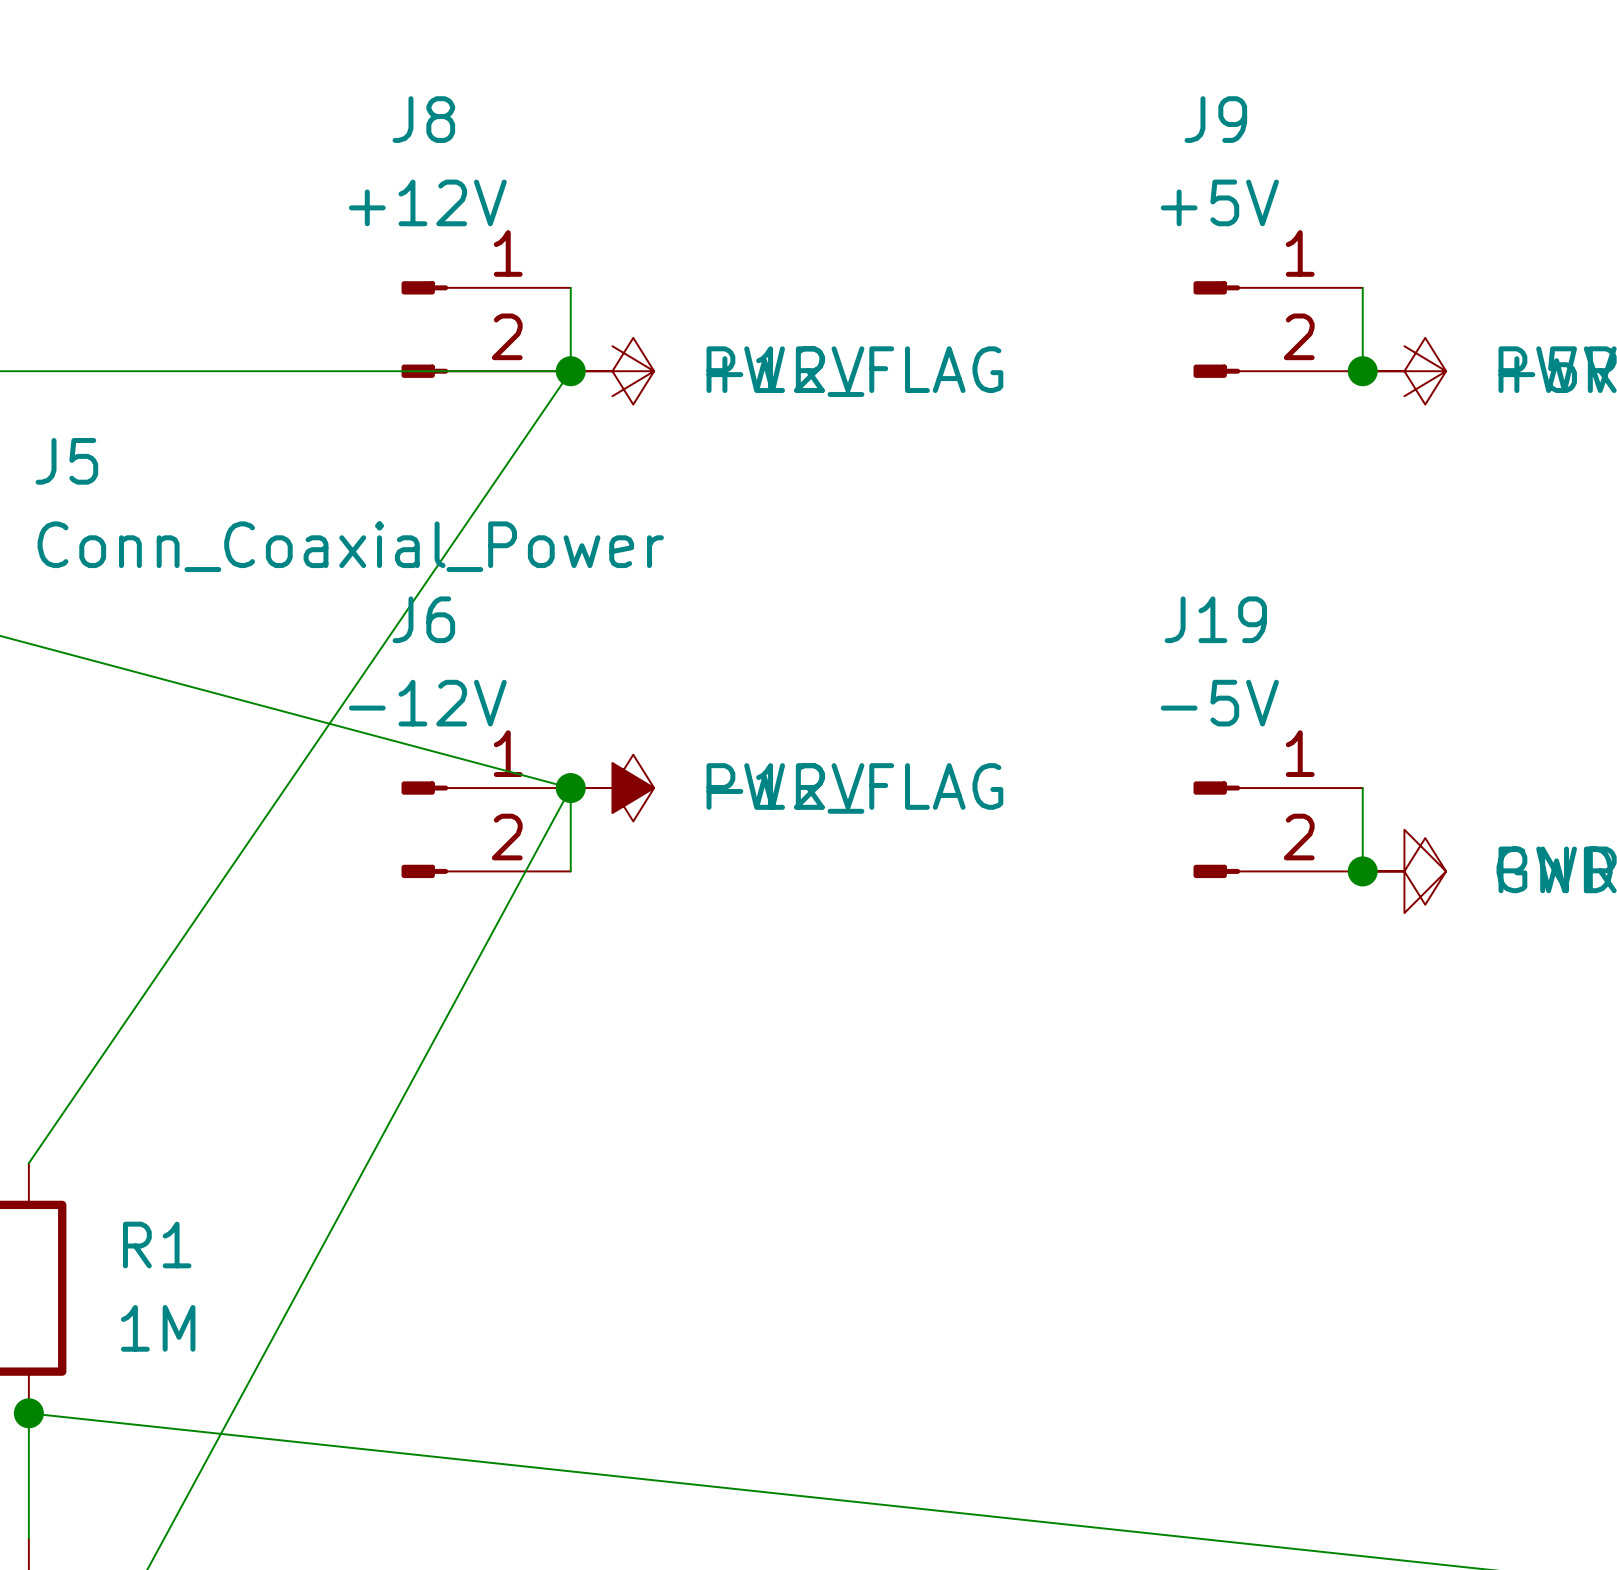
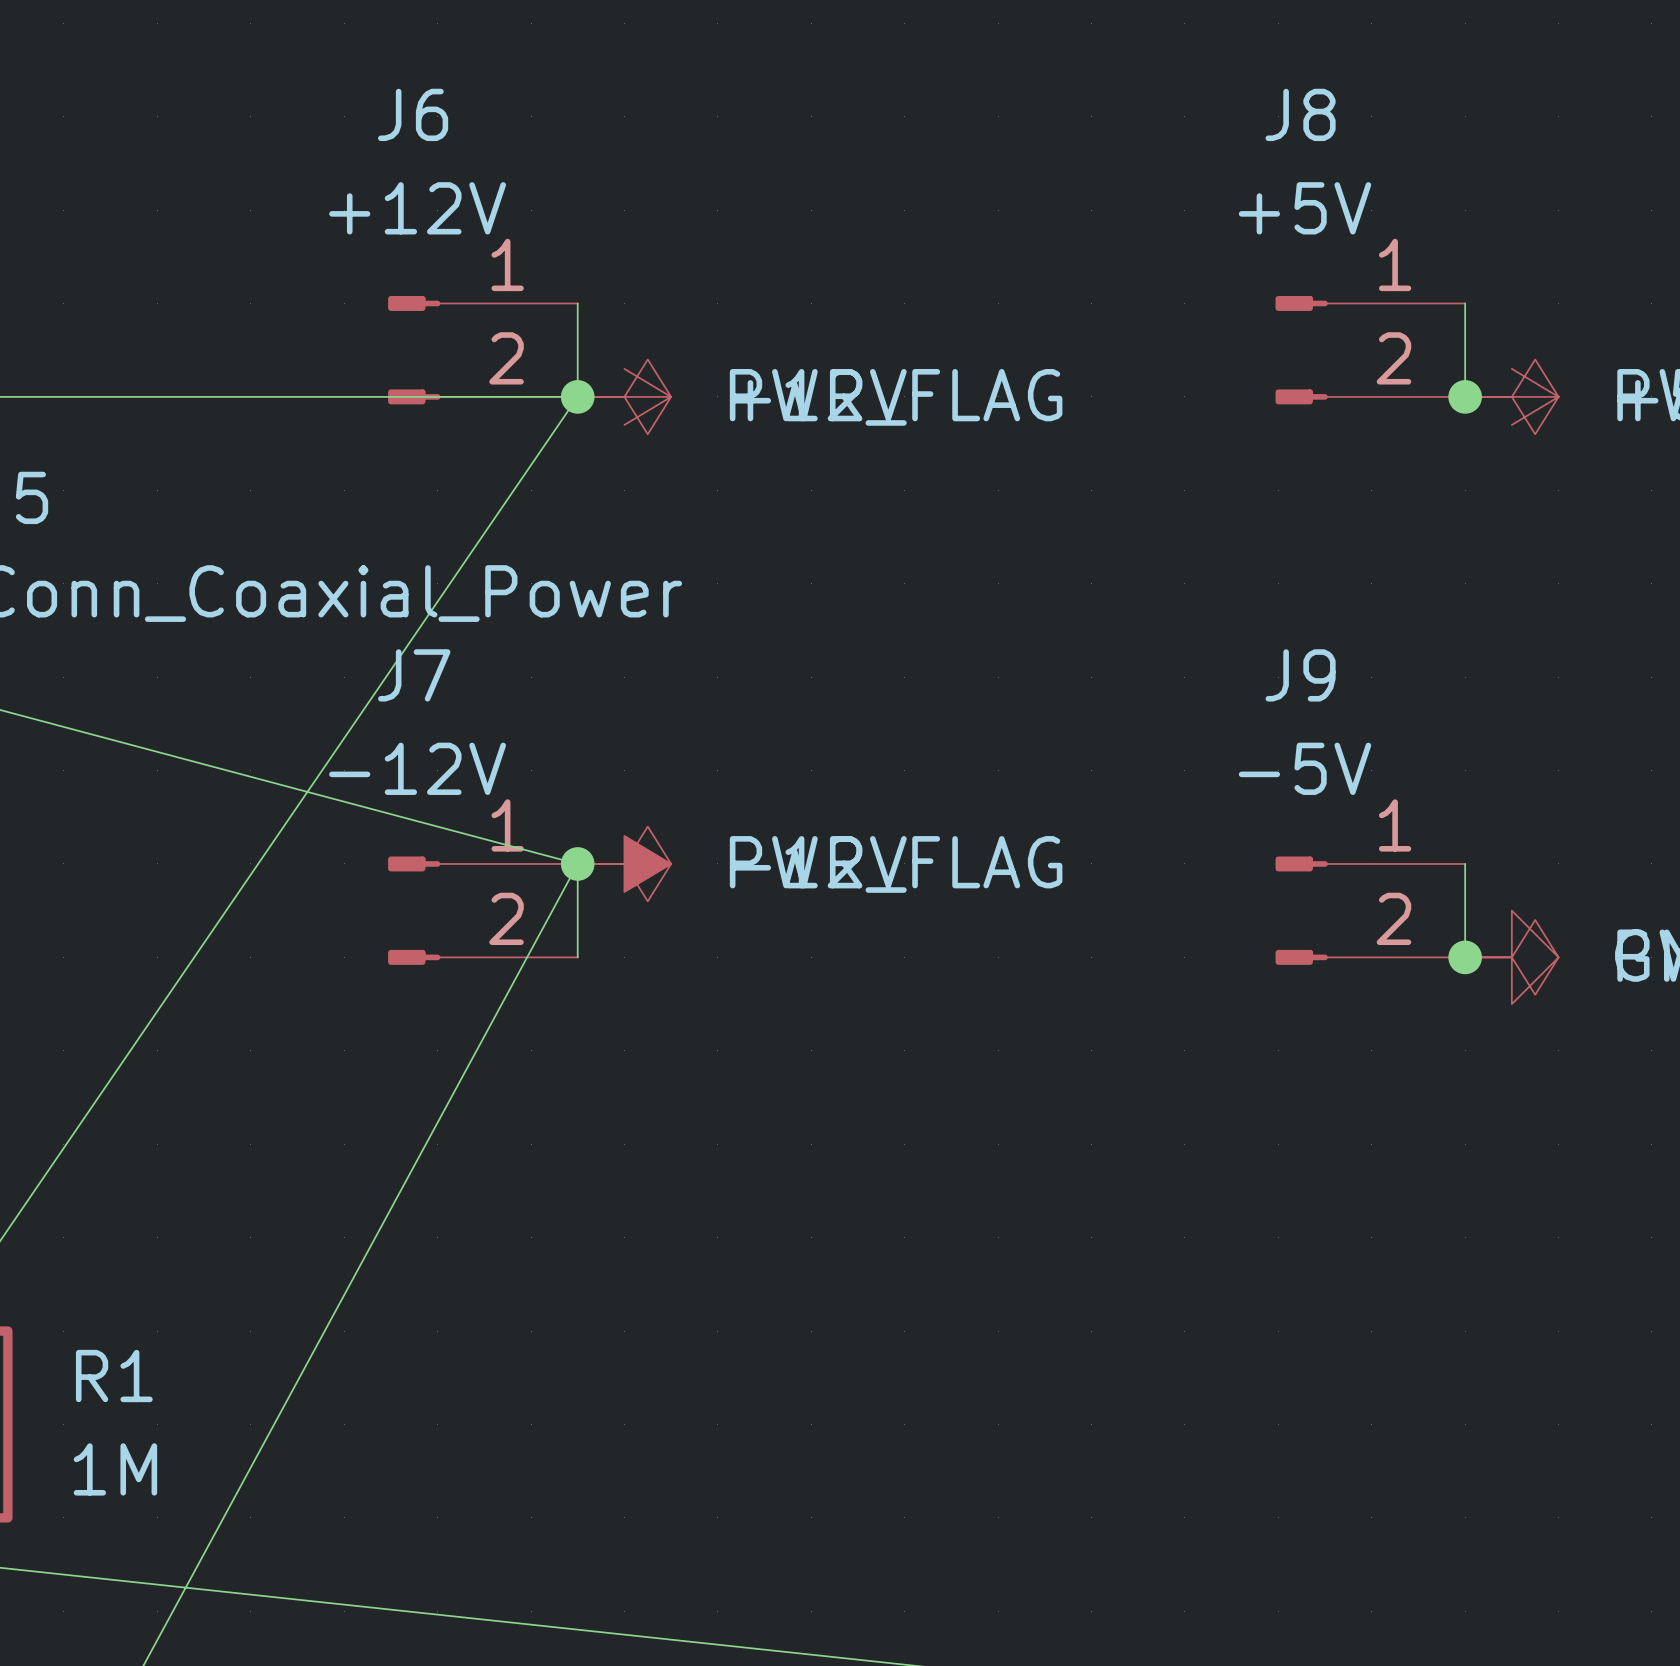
J8 name: J8 (423, 119) -> J6 (413, 114)
J9 name: J9 (1215, 119) -> J8 (1300, 114)
J6 name: J6 (423, 619) -> J7 (414, 675)
J19 name: J19 (1215, 619) -> J9 (1300, 675)

